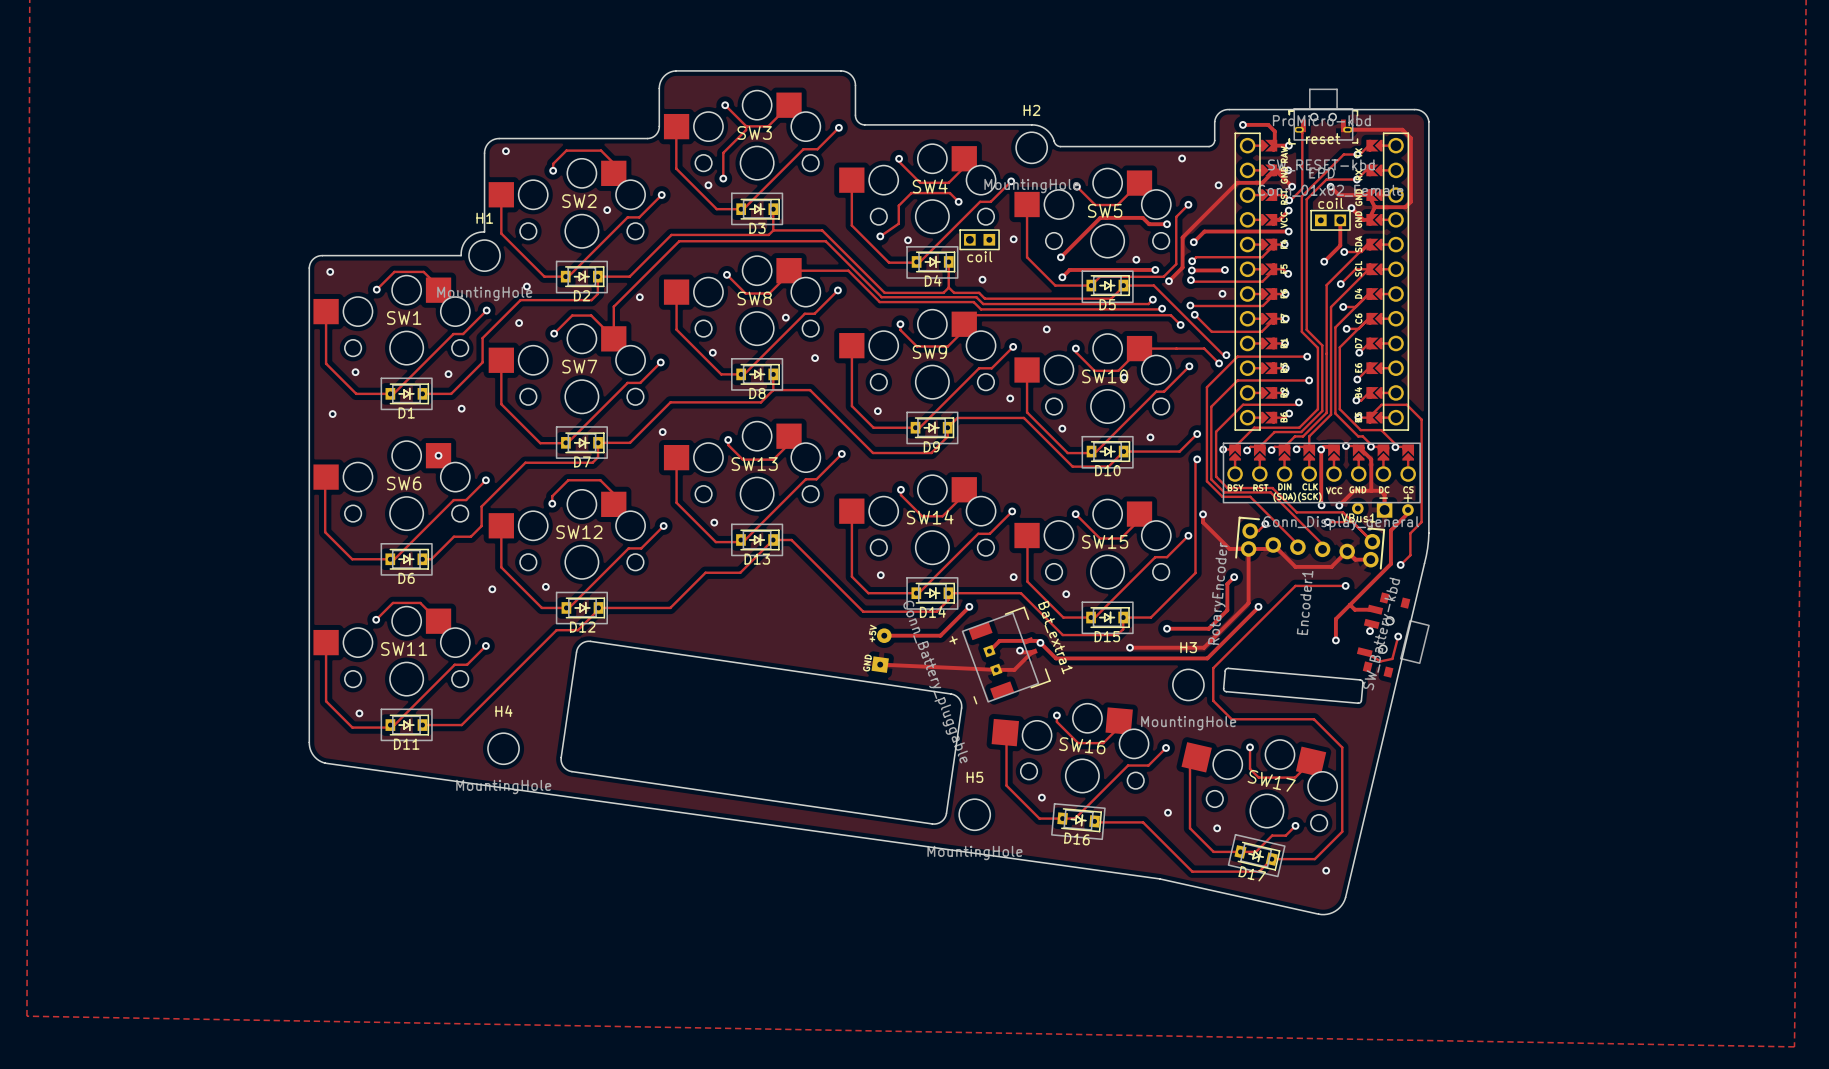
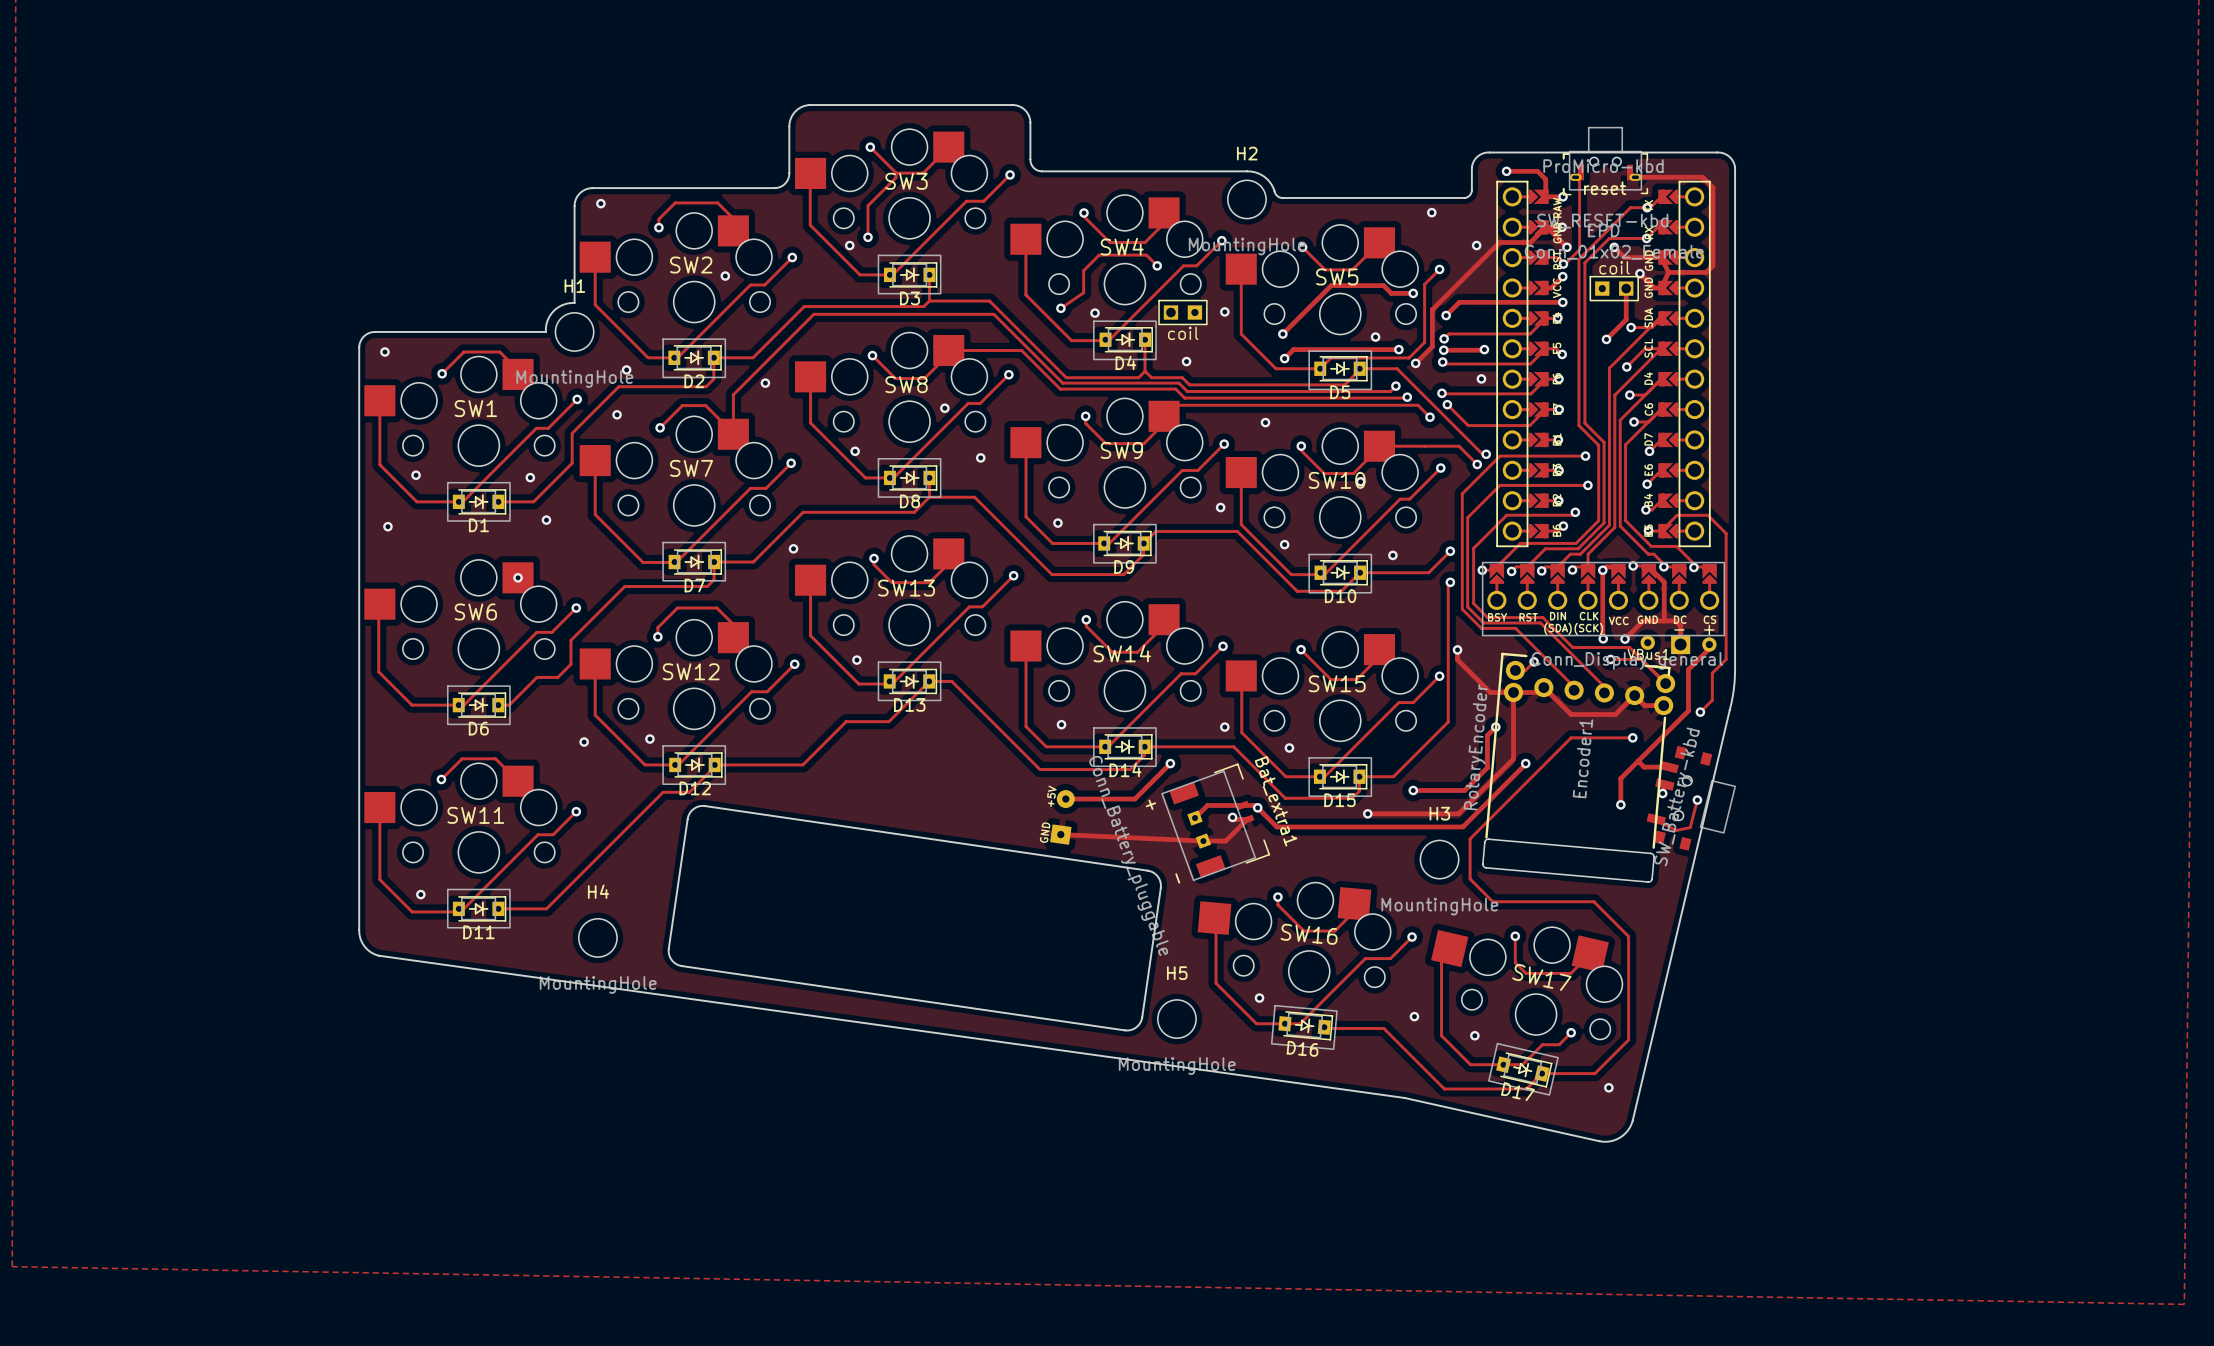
Encoder1 footprint: [1223, 516, 1386, 704] -> [1482, 652, 1676, 883]

